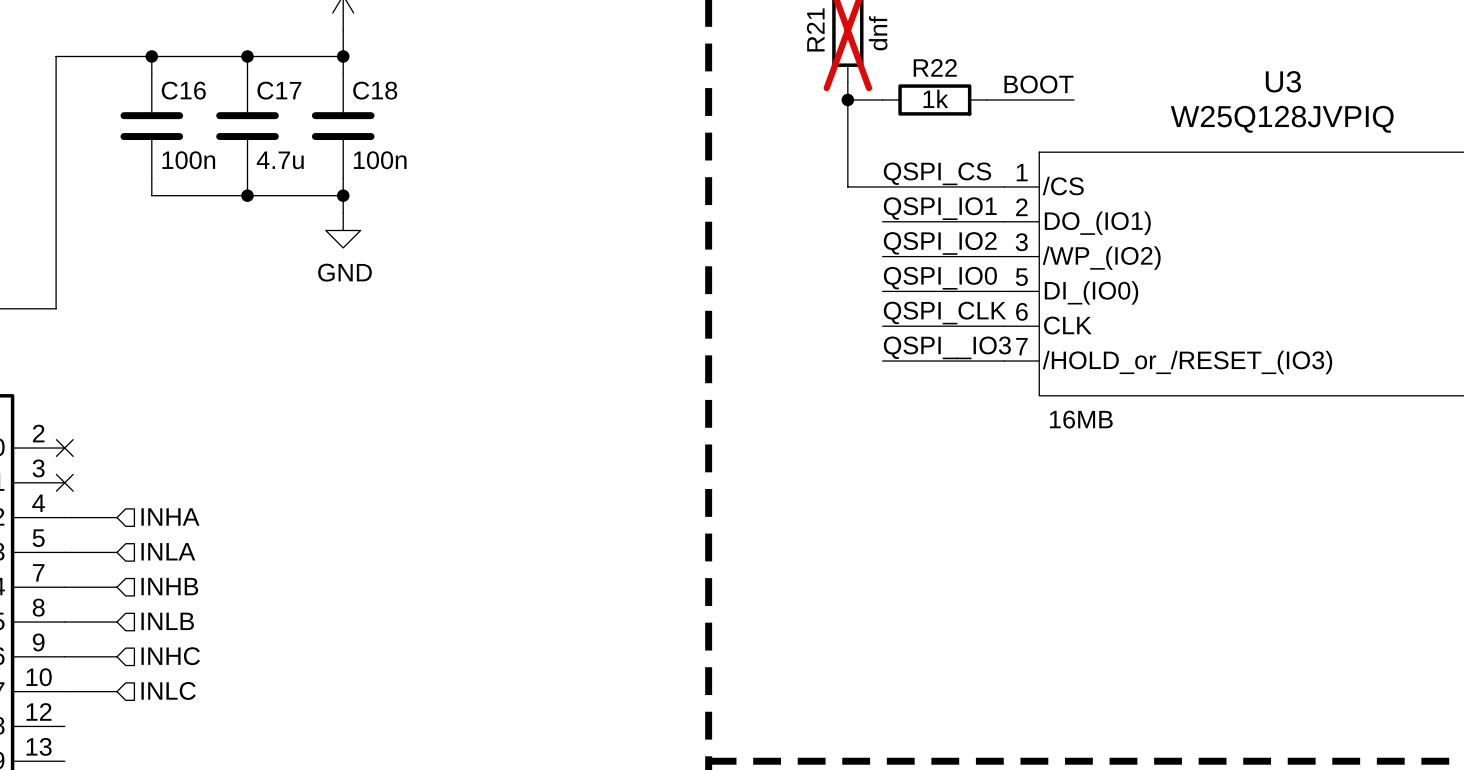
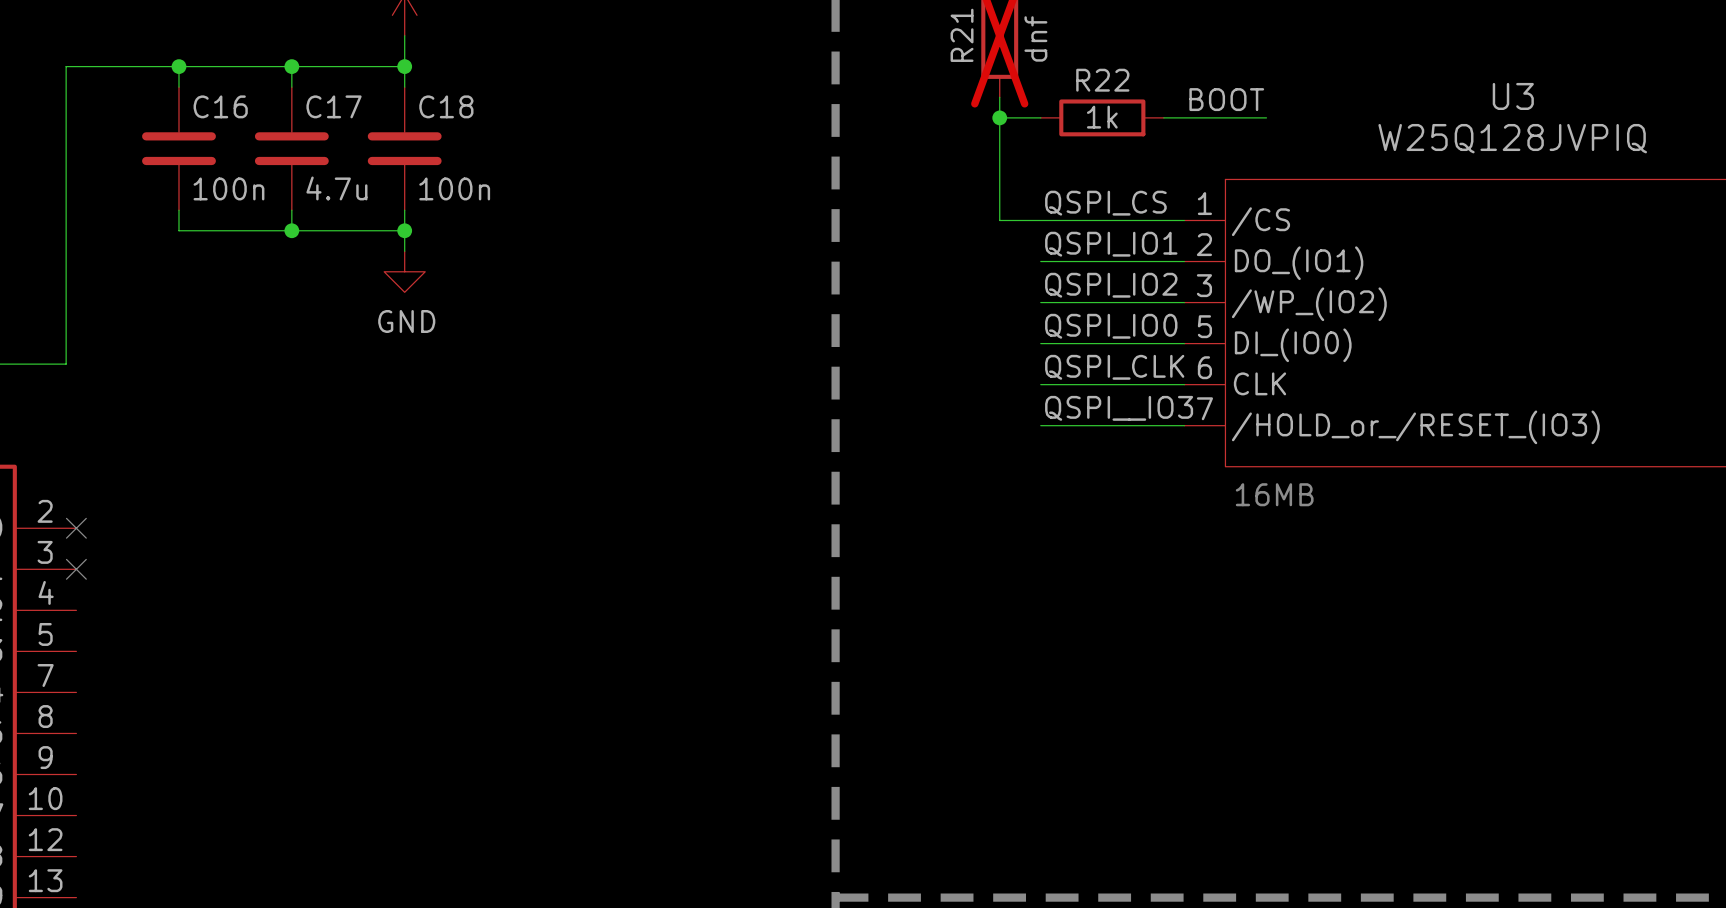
hierarchical label: INHA (170, 516) -> none
wire: (64, 517) (116, 517) -> none
hierarchical label: INLA (168, 551) -> none
wire: (64, 552) (116, 552) -> none
hierarchical label: INHB (169, 586) -> none
wire: (64, 587) (116, 587) -> none
hierarchical label: INLB (167, 621) -> none
wire: (64, 622) (116, 622) -> none
wire: (64, 656) (116, 656) -> none
hierarchical label: INHC (170, 656) -> none
hierarchical label: INLC (168, 690) -> none
wire: (64, 691) (116, 691) -> none

